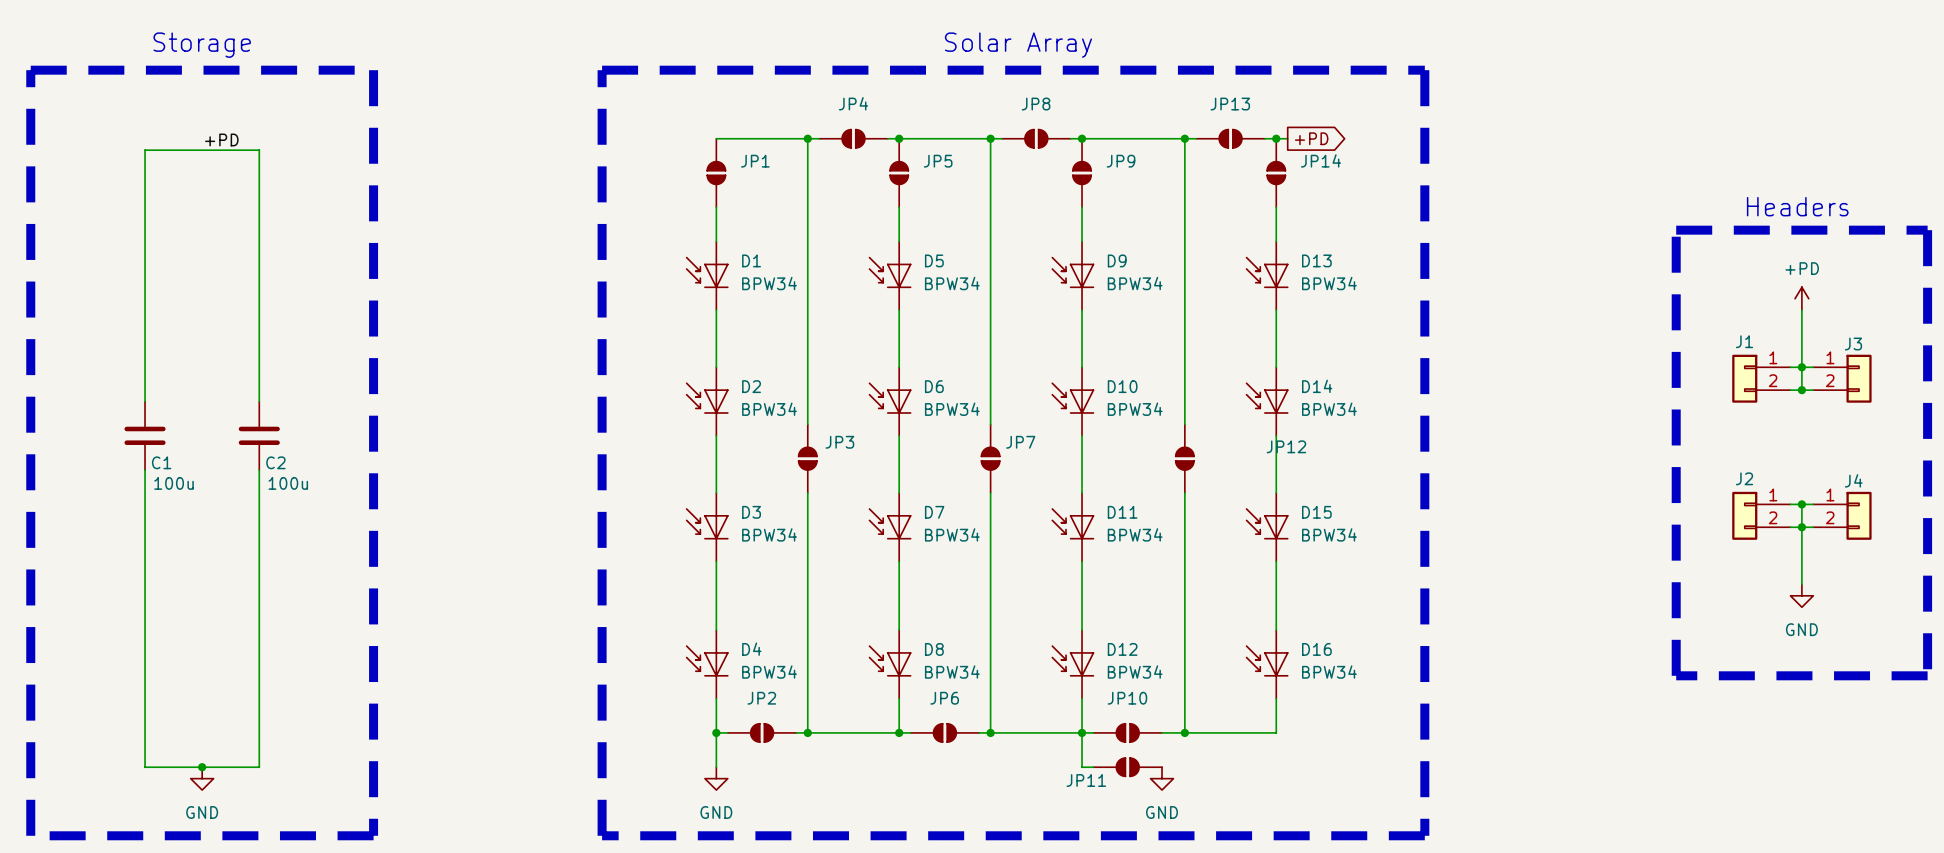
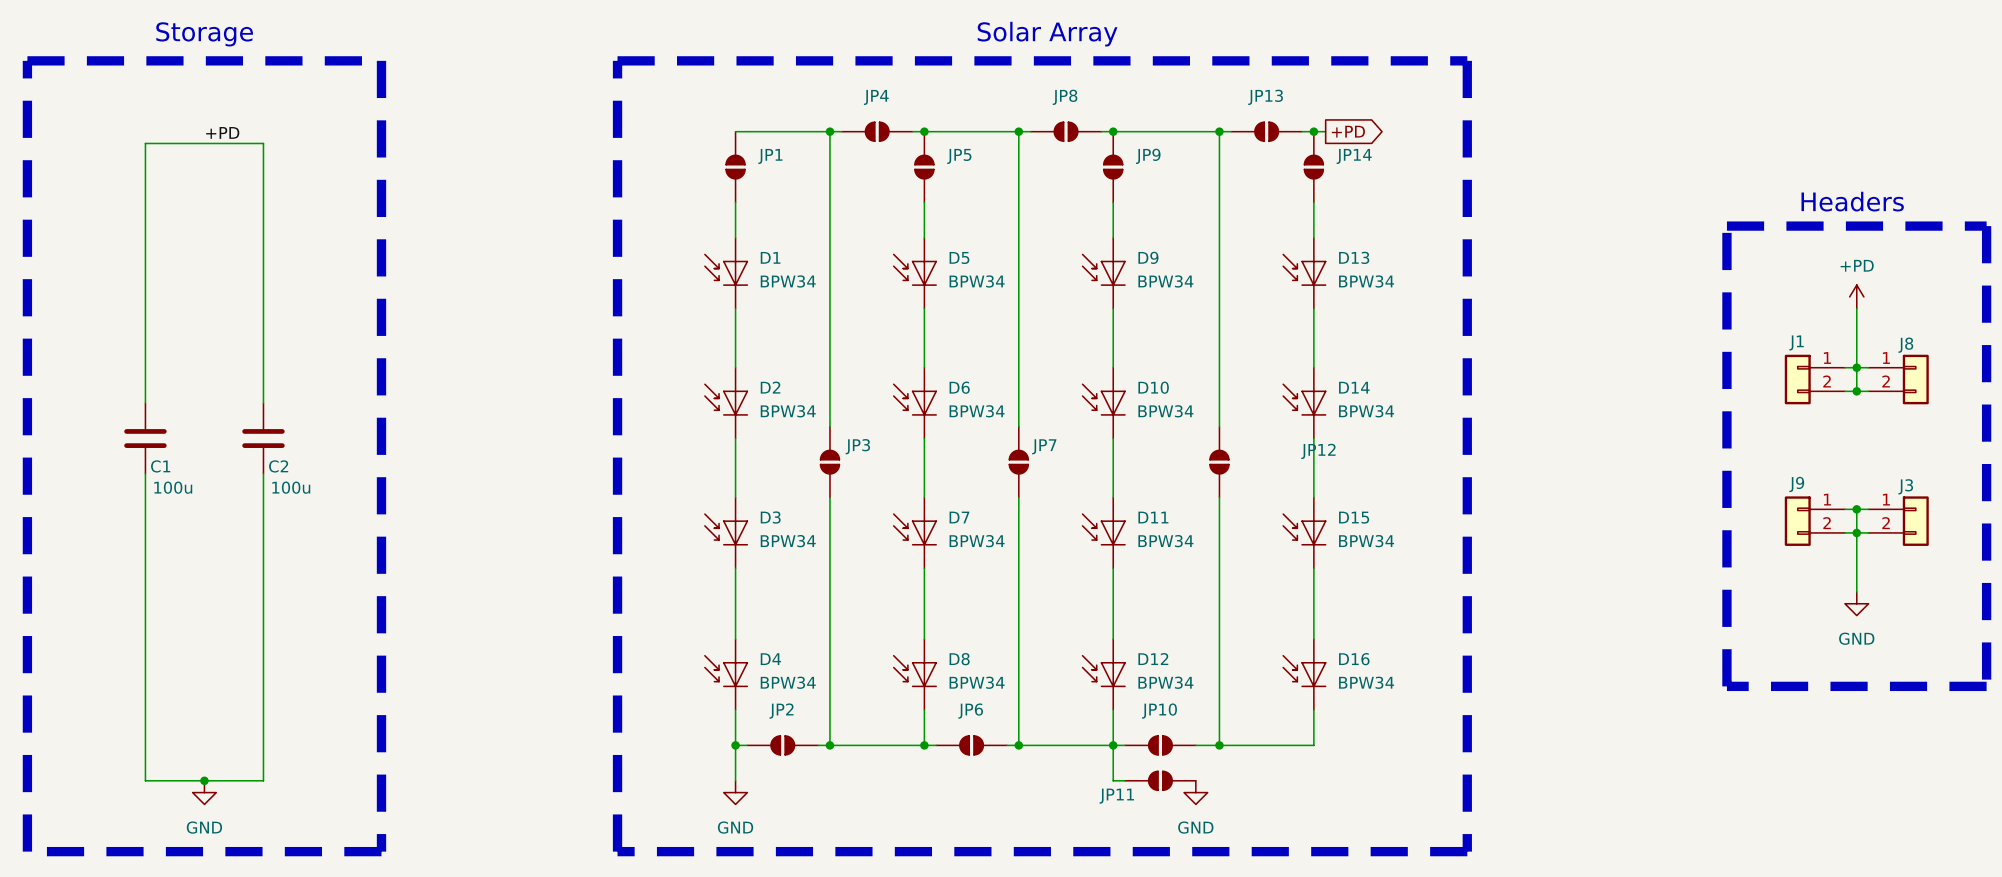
J3 name: J3 (1853, 344) -> J8 (1905, 345)
J2 name: J2 (1744, 478) -> J9 (1796, 484)
J4 name: J4 (1853, 480) -> J3 (1905, 486)

